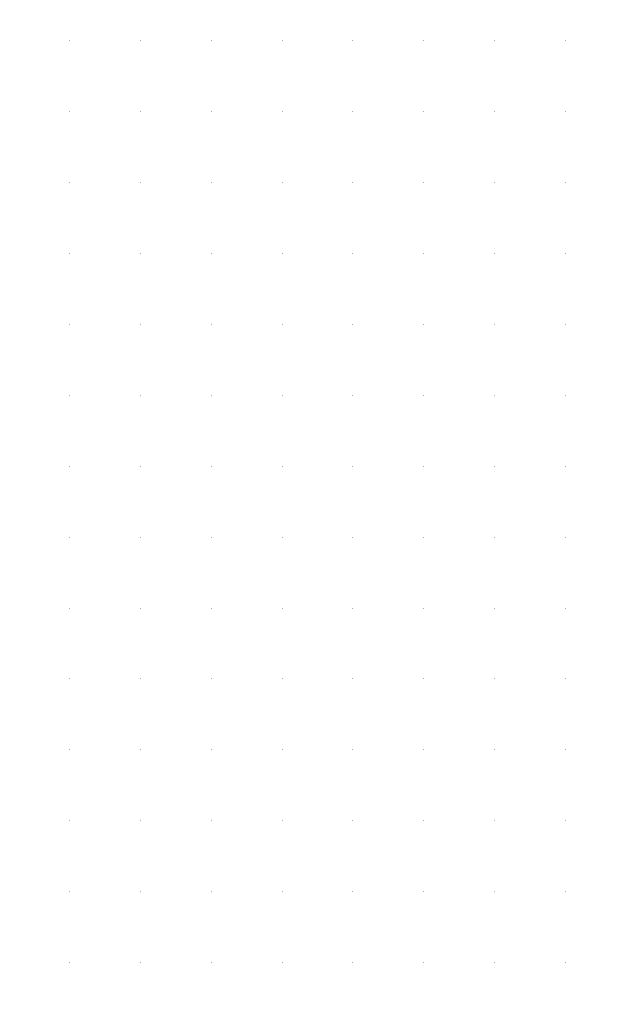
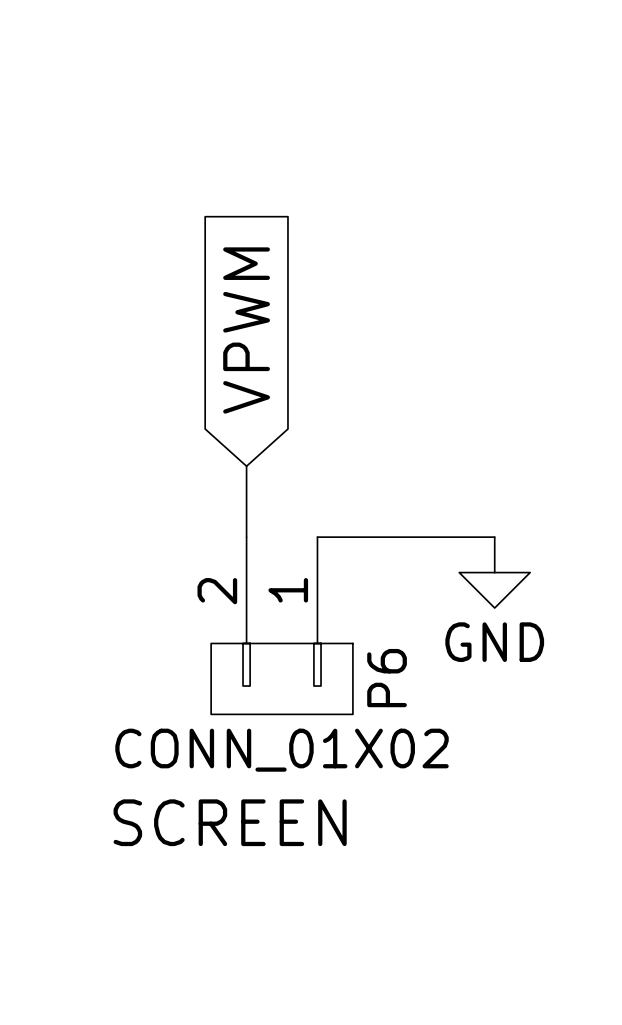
global label: none -> VPWM (246, 330)
wire: none -> (246, 466) (246, 537)
wire: none -> (317, 537) (494, 537)
power symbol: none -> GND (494, 572)
P6: none -> CONN_01X02 (282, 625)
text: none -> SCREEN (230, 822)

